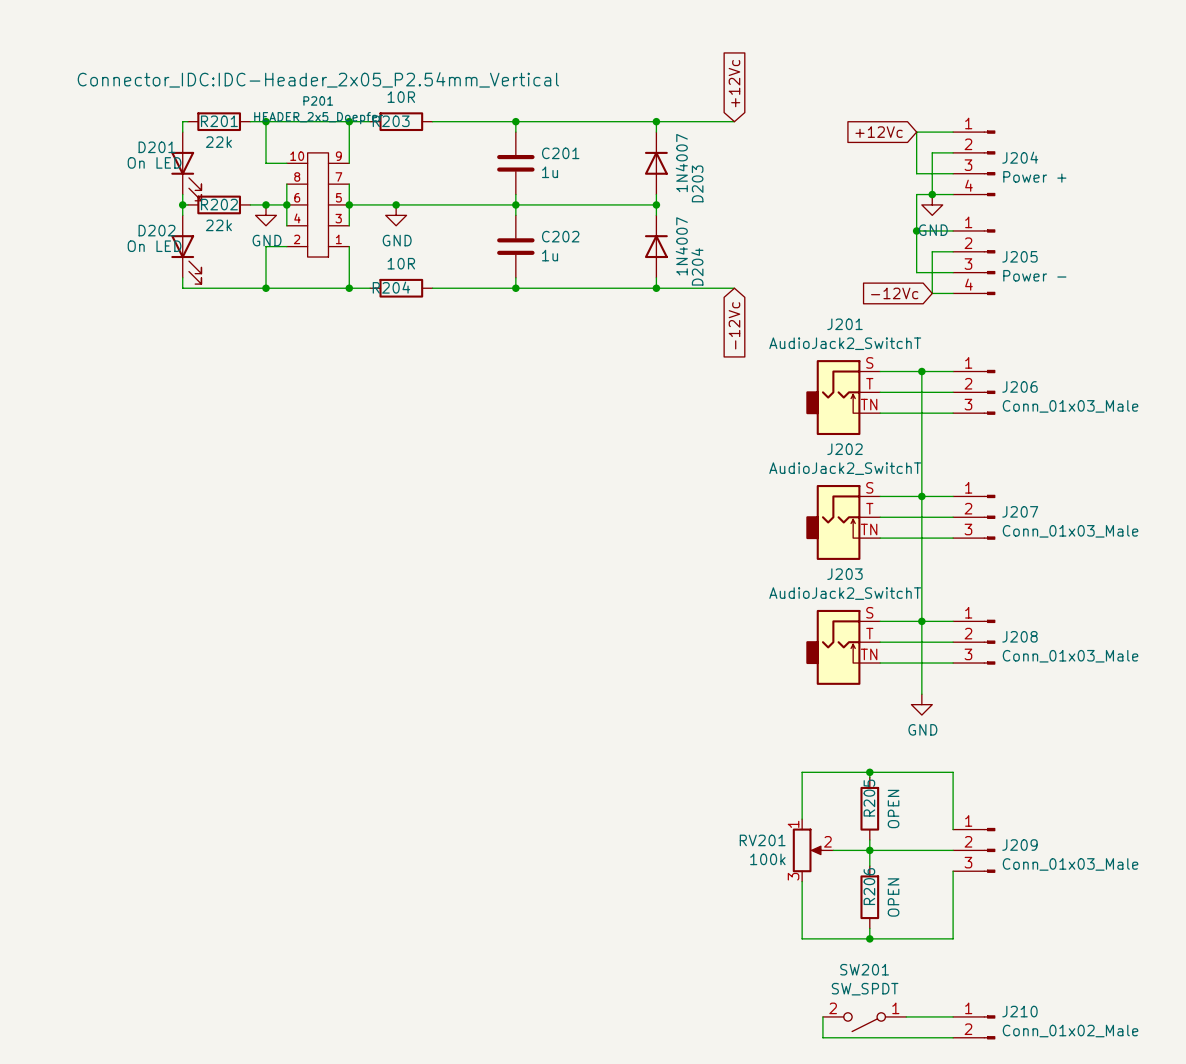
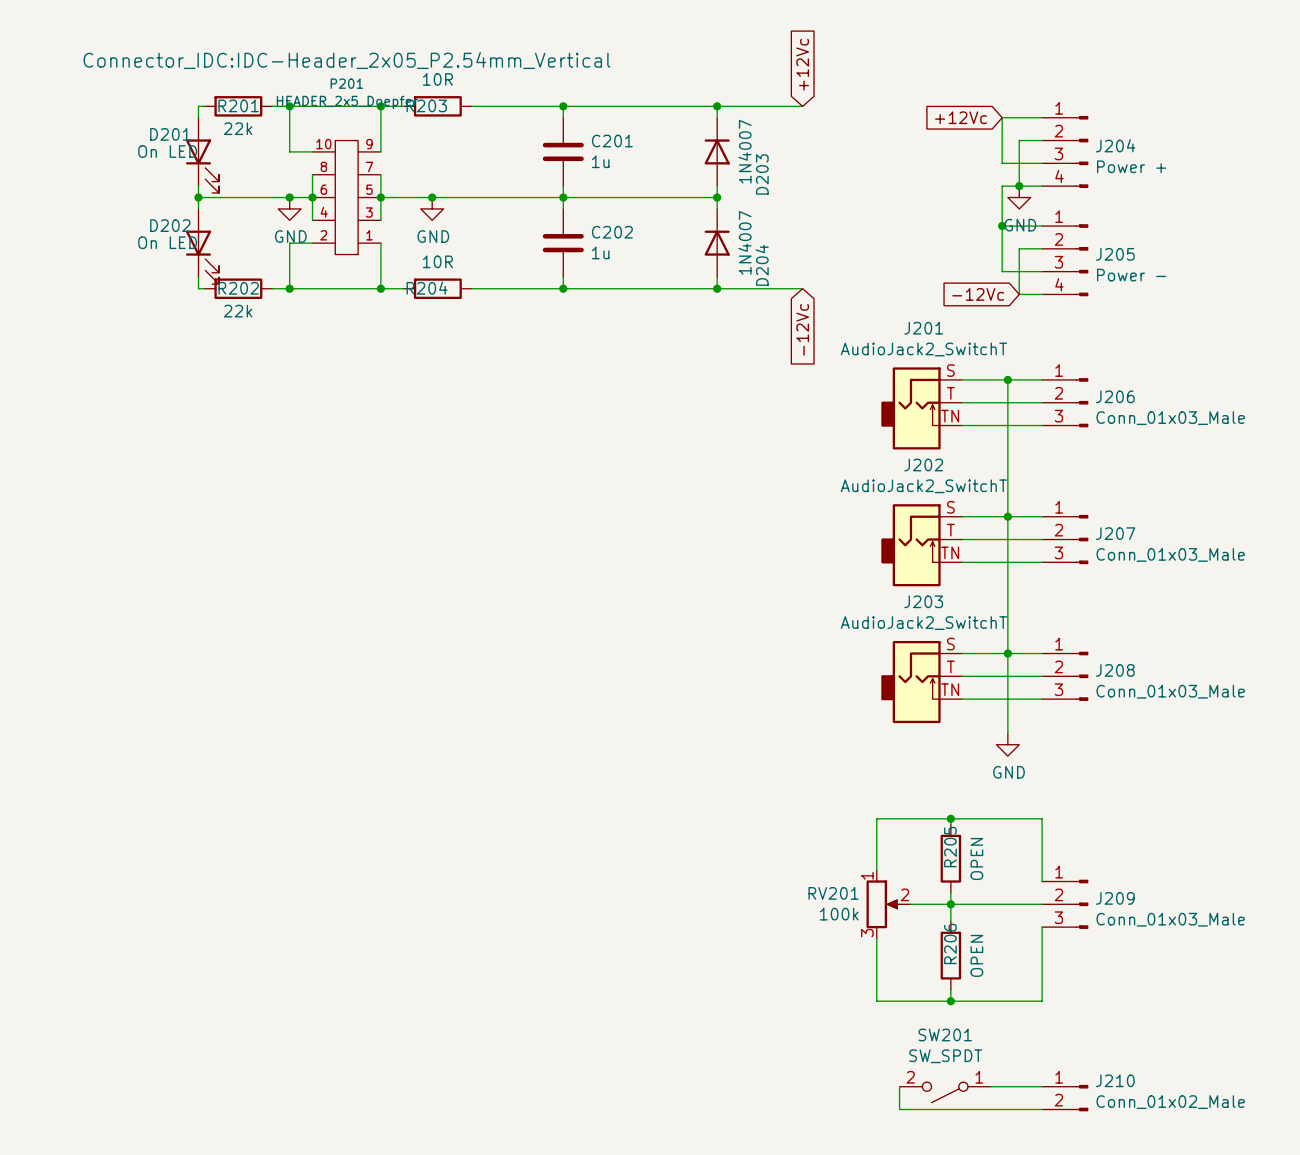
R202 position: (219, 204) -> (238, 288)

